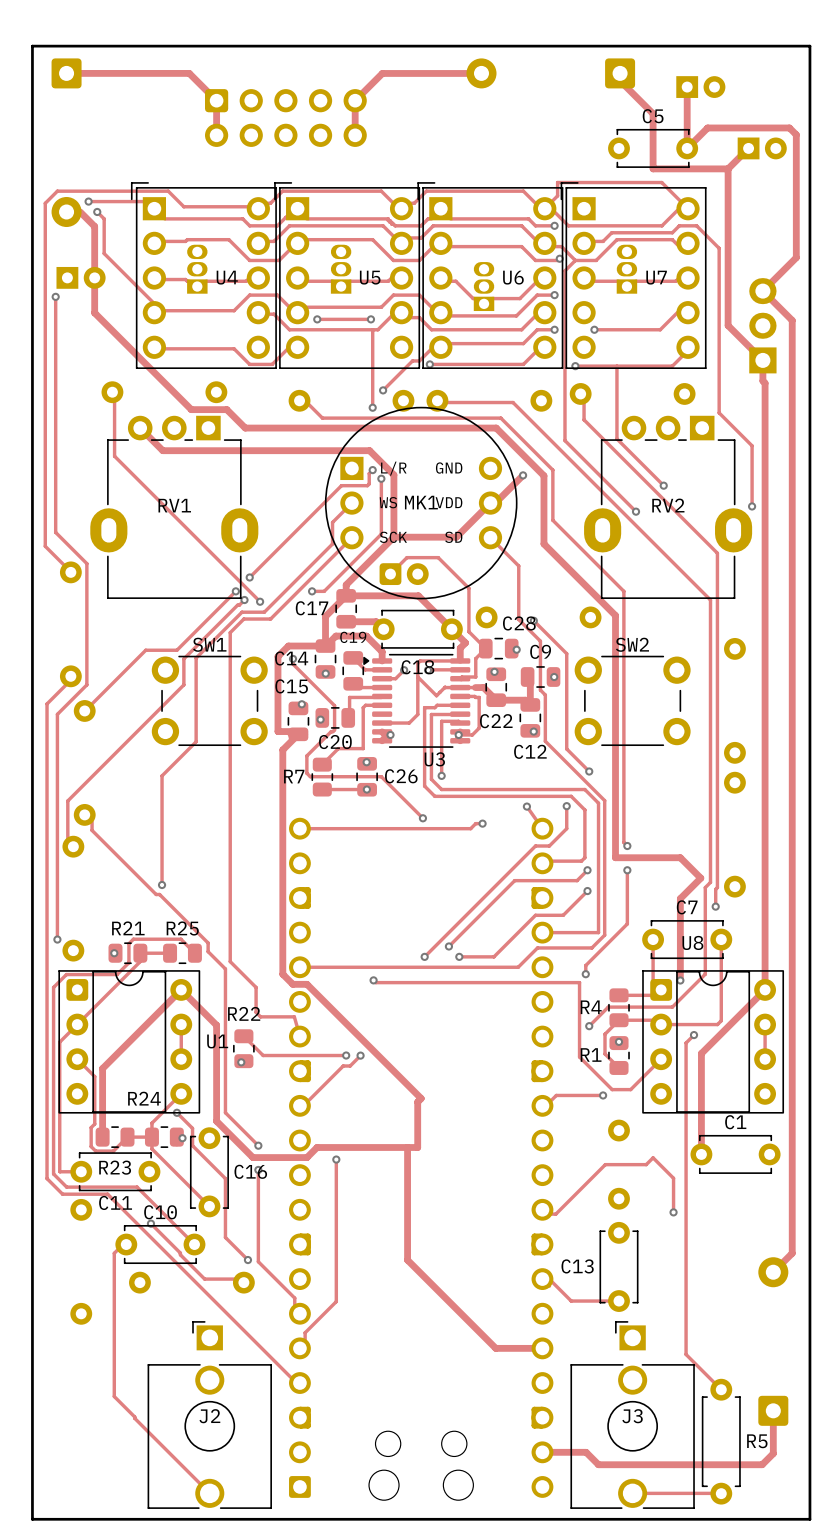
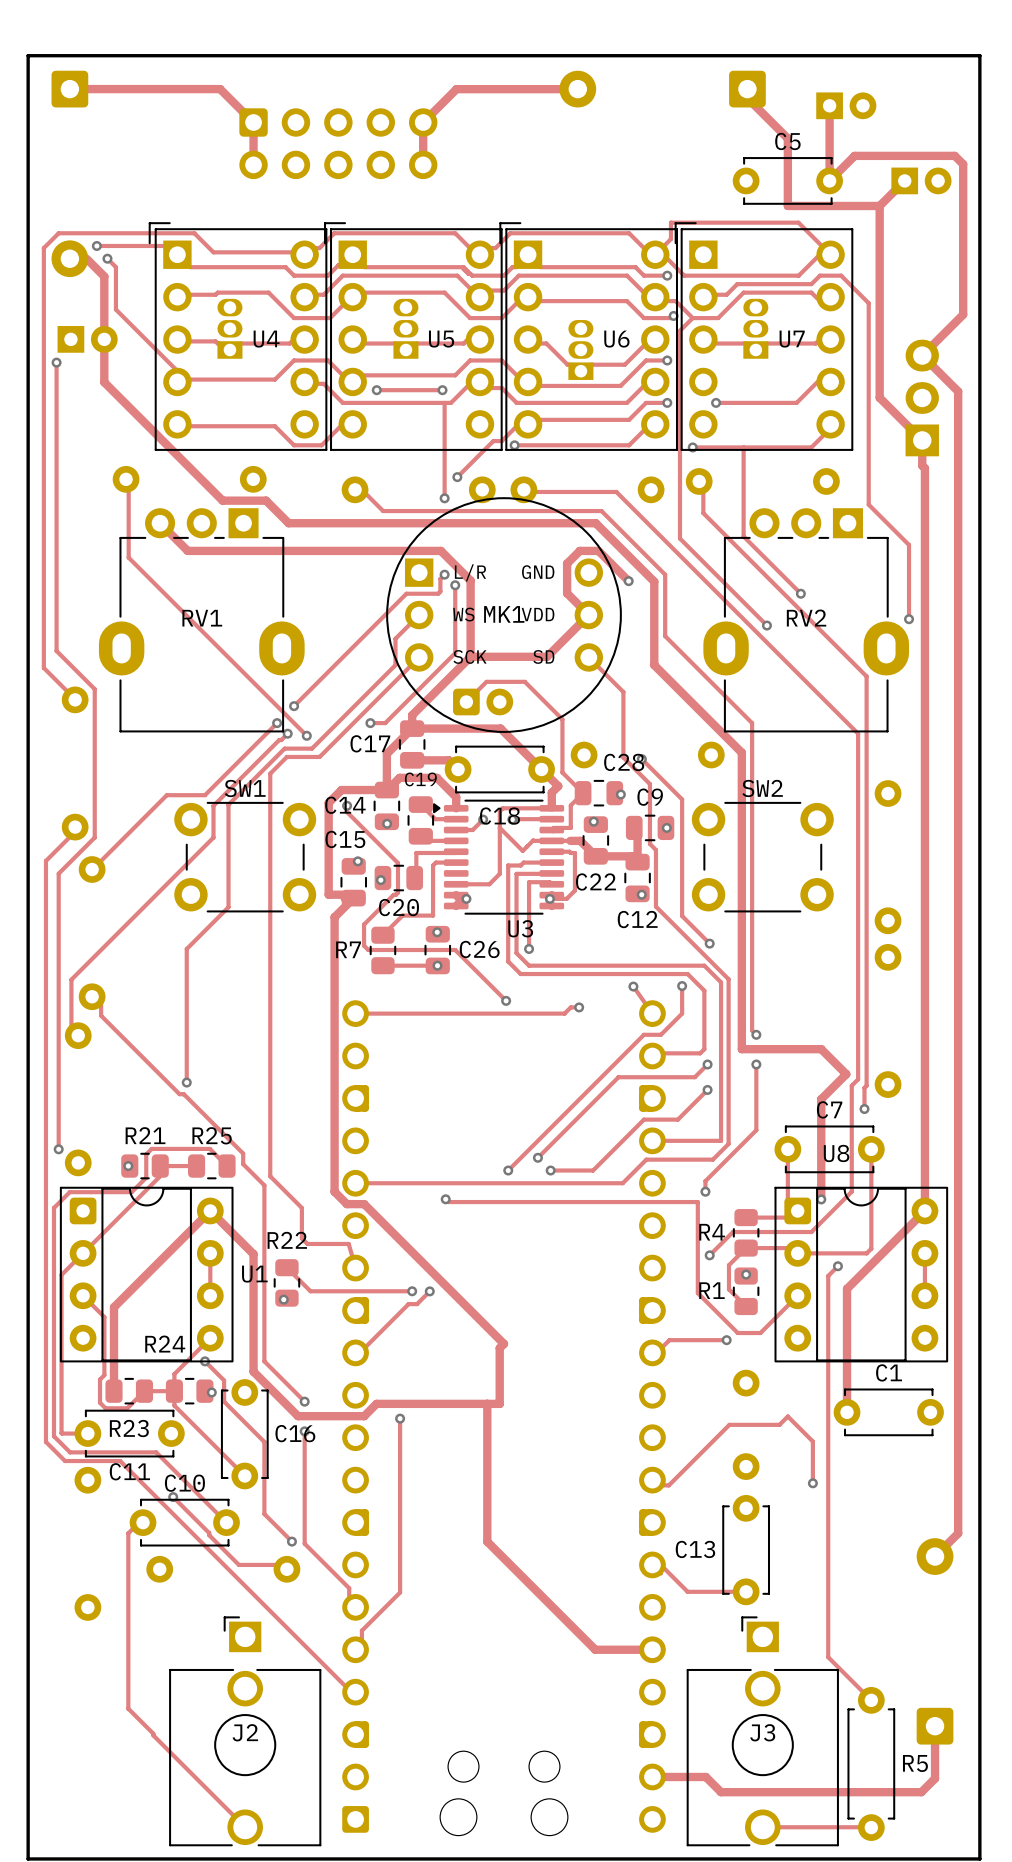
track: (523, 475) (495, 503) (490, 503) -> (628, 581) (598, 550) (579, 550) (567, 563) (567, 593) (588, 615)

